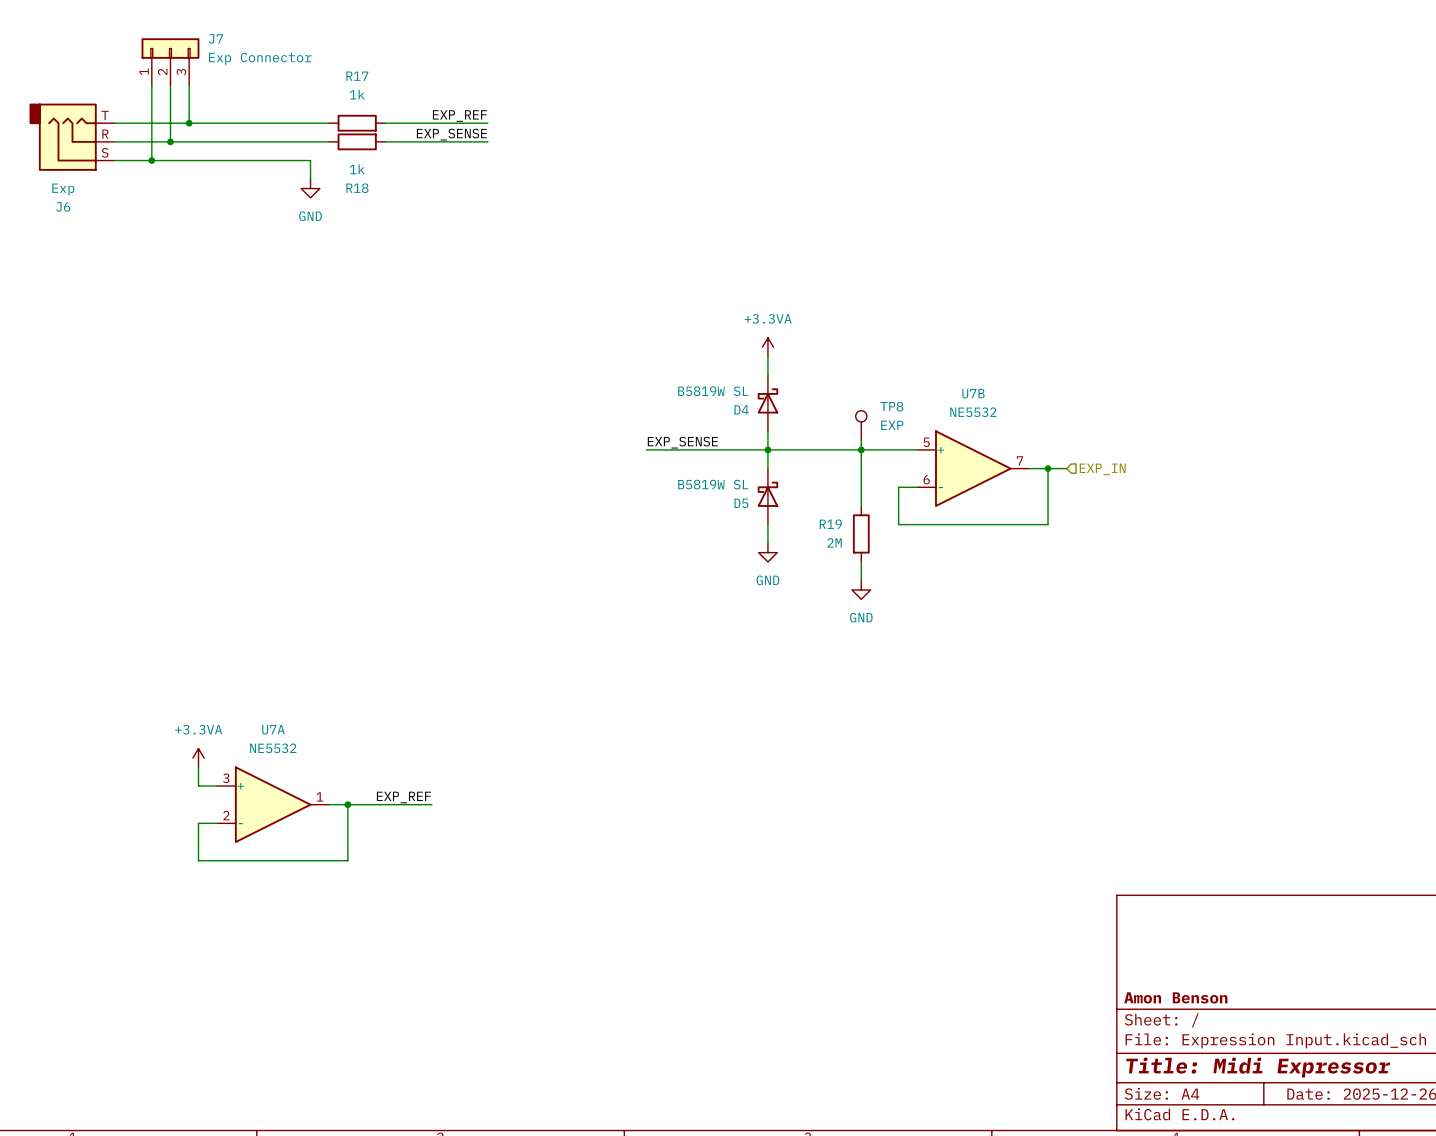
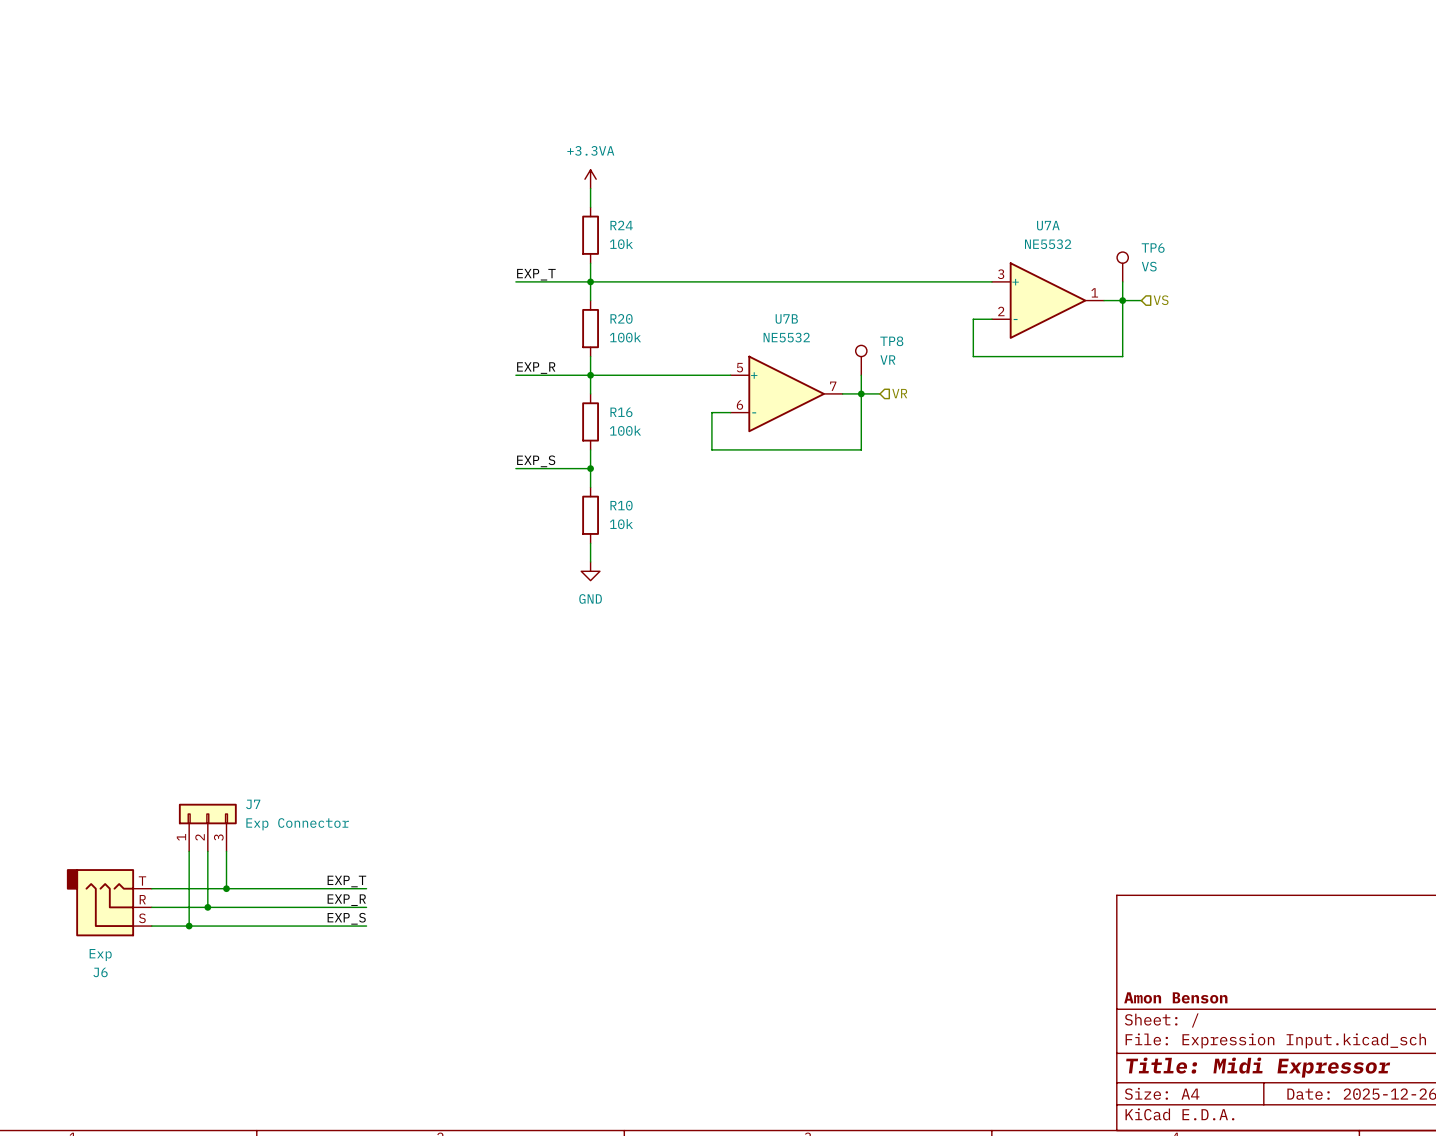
J7 position: (170, 62) -> (207, 827)
wire: (151, 85) (151, 160) -> none
wire: (170, 85) (170, 141) -> none
wire: (189, 85) (189, 123) -> none
label: EXP_REF (459, 116) -> none
wire: (114, 123) (329, 123) -> none
junction: (189, 123) -> none
R17: 1k (357, 123) -> none
wire: (385, 123) (487, 123) -> none
label: EXP_SENSE (451, 134) -> none
J6 position: (72, 137) -> (109, 902)
wire: (114, 141) (329, 141) -> none
junction: (170, 141) -> none
R18: 1k (357, 141) -> none
wire: (385, 141) (487, 141) -> none
wire: (114, 160) (310, 160) (310, 179) -> none
junction: (151, 160) -> none
power symbol: none -> +3.3VA (590, 179)
power symbol: GND (310, 188) -> none
wire: none -> (590, 188) (590, 207)
R24: none -> 10k (590, 235)
wire: none -> (590, 263) (590, 300)
TP6: none -> VS (1122, 266)
label: none -> EXP_T (536, 274)
wire: none -> (515, 281) (991, 281)
junction: none -> (590, 281)
wire: none -> (1122, 281) (1122, 356) (973, 356) (973, 319) (991, 319)
wire: none -> (1104, 300) (1141, 300)
junction: none -> (1122, 300)
hierarchical label: none -> VS (1161, 300)
R20: none -> 100k (590, 328)
power symbol: +3.3VA (767, 347) -> none
wire: none -> (590, 356) (590, 393)
label: none -> EXP_R (536, 368)
wire: none -> (515, 375) (730, 375)
junction: none -> (590, 375)
wire: none -> (861, 375) (861, 440)
wire: none -> (842, 393) (879, 393)
junction: none -> (861, 393)
hierarchical label: none -> VR (899, 393)
D4: B5819W SL (767, 403) -> none
R16: none -> 100k (590, 421)
TP8 position: (861, 425) -> (861, 360)
TP8 value: EXP (892, 425) -> VR (887, 359)
wire: (767, 431) (767, 468) -> (590, 449) (590, 487)
label: EXP_SENSE (682, 442) -> none
wire: (646, 449) (711, 449) -> (730, 412) (711, 412) (711, 449)
junction: (767, 449) -> none
junction: (861, 449) -> none
wire: (917, 449) (861, 449) (861, 505) -> none
label: none -> EXP_S (536, 461)
wire: none -> (515, 468) (590, 468)
junction: none -> (590, 468)
U7B position: (973, 468) -> (786, 393)
wire: (1029, 468) (1066, 468) -> none
wire: (1048, 468) (1048, 524) (898, 524) (898, 487) (917, 487) -> none
junction: (1048, 468) -> none
hierarchical label: EXP_IN (1102, 469) -> none
D5: B5819W SL (767, 496) -> none
R10: none -> 10k (590, 515)
wire: (767, 524) (767, 543) -> (590, 543) (590, 561)
R19: 2M (861, 533) -> none
power symbol: GND (767, 552) -> none
wire: (861, 561) (861, 580) -> none
power symbol: none -> GND (590, 571)
power symbol: GND (861, 589) -> none
power symbol: +3.3VA (198, 758) -> none
wire: (198, 767) (198, 786) (217, 786) -> none
label: EXP_REF (403, 797) -> none
U7A position: (273, 804) -> (1048, 300)
wire: (329, 804) (431, 804) -> none
wire: (347, 804) (347, 860) (198, 860) (198, 823) (217, 823) -> none
junction: (347, 804) -> none
wire: none -> (189, 851) (189, 926)
wire: none -> (207, 851) (207, 907)
wire: none -> (226, 851) (226, 888)
label: none -> EXP_T (346, 881)
wire: none -> (151, 888) (366, 888)
junction: none -> (226, 888)
label: none -> EXP_R (346, 900)
wire: none -> (151, 907) (366, 907)
junction: none -> (207, 907)
label: none -> EXP_S (346, 918)
wire: none -> (151, 926) (366, 926)
junction: none -> (189, 926)

